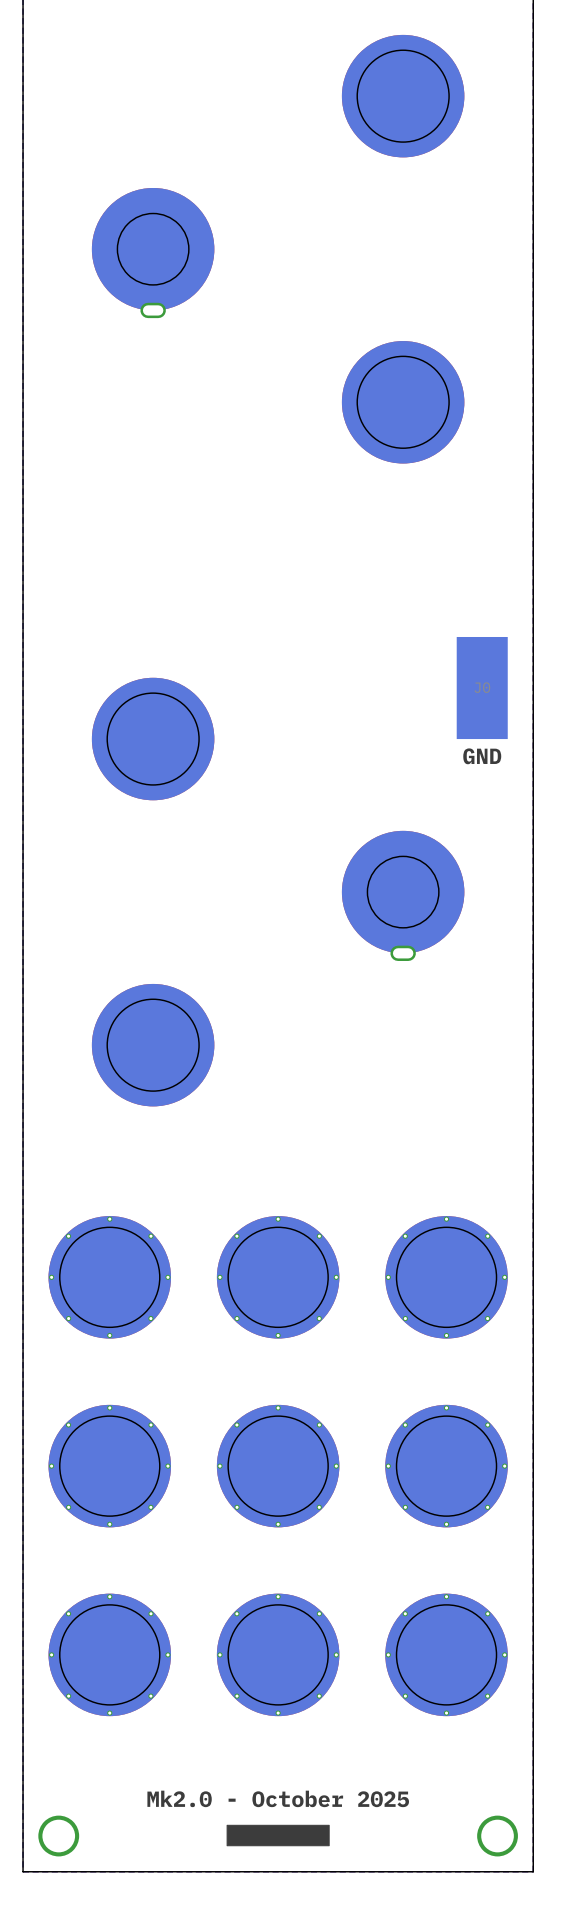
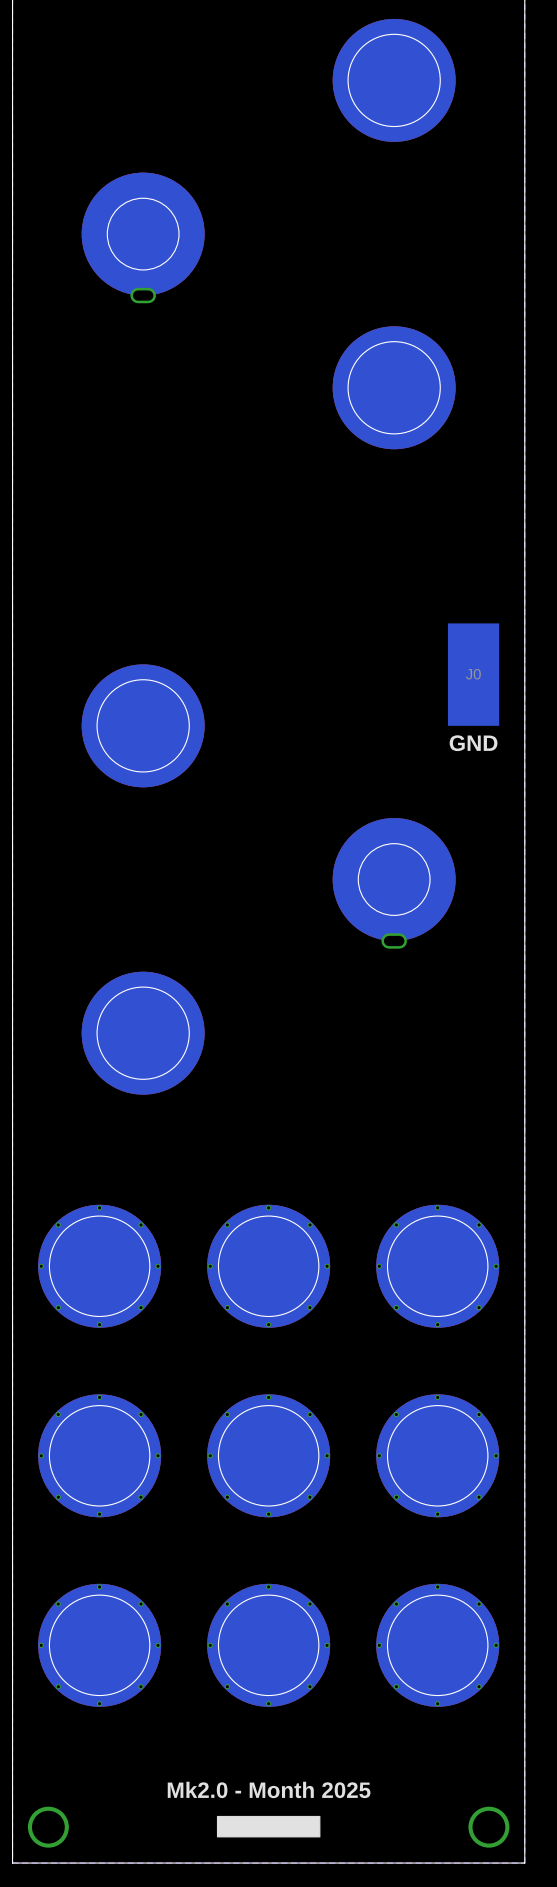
text: Mk2.0 - October 2025 (278, 1798) -> Mk2.0 - Month 2025 (269, 1789)

